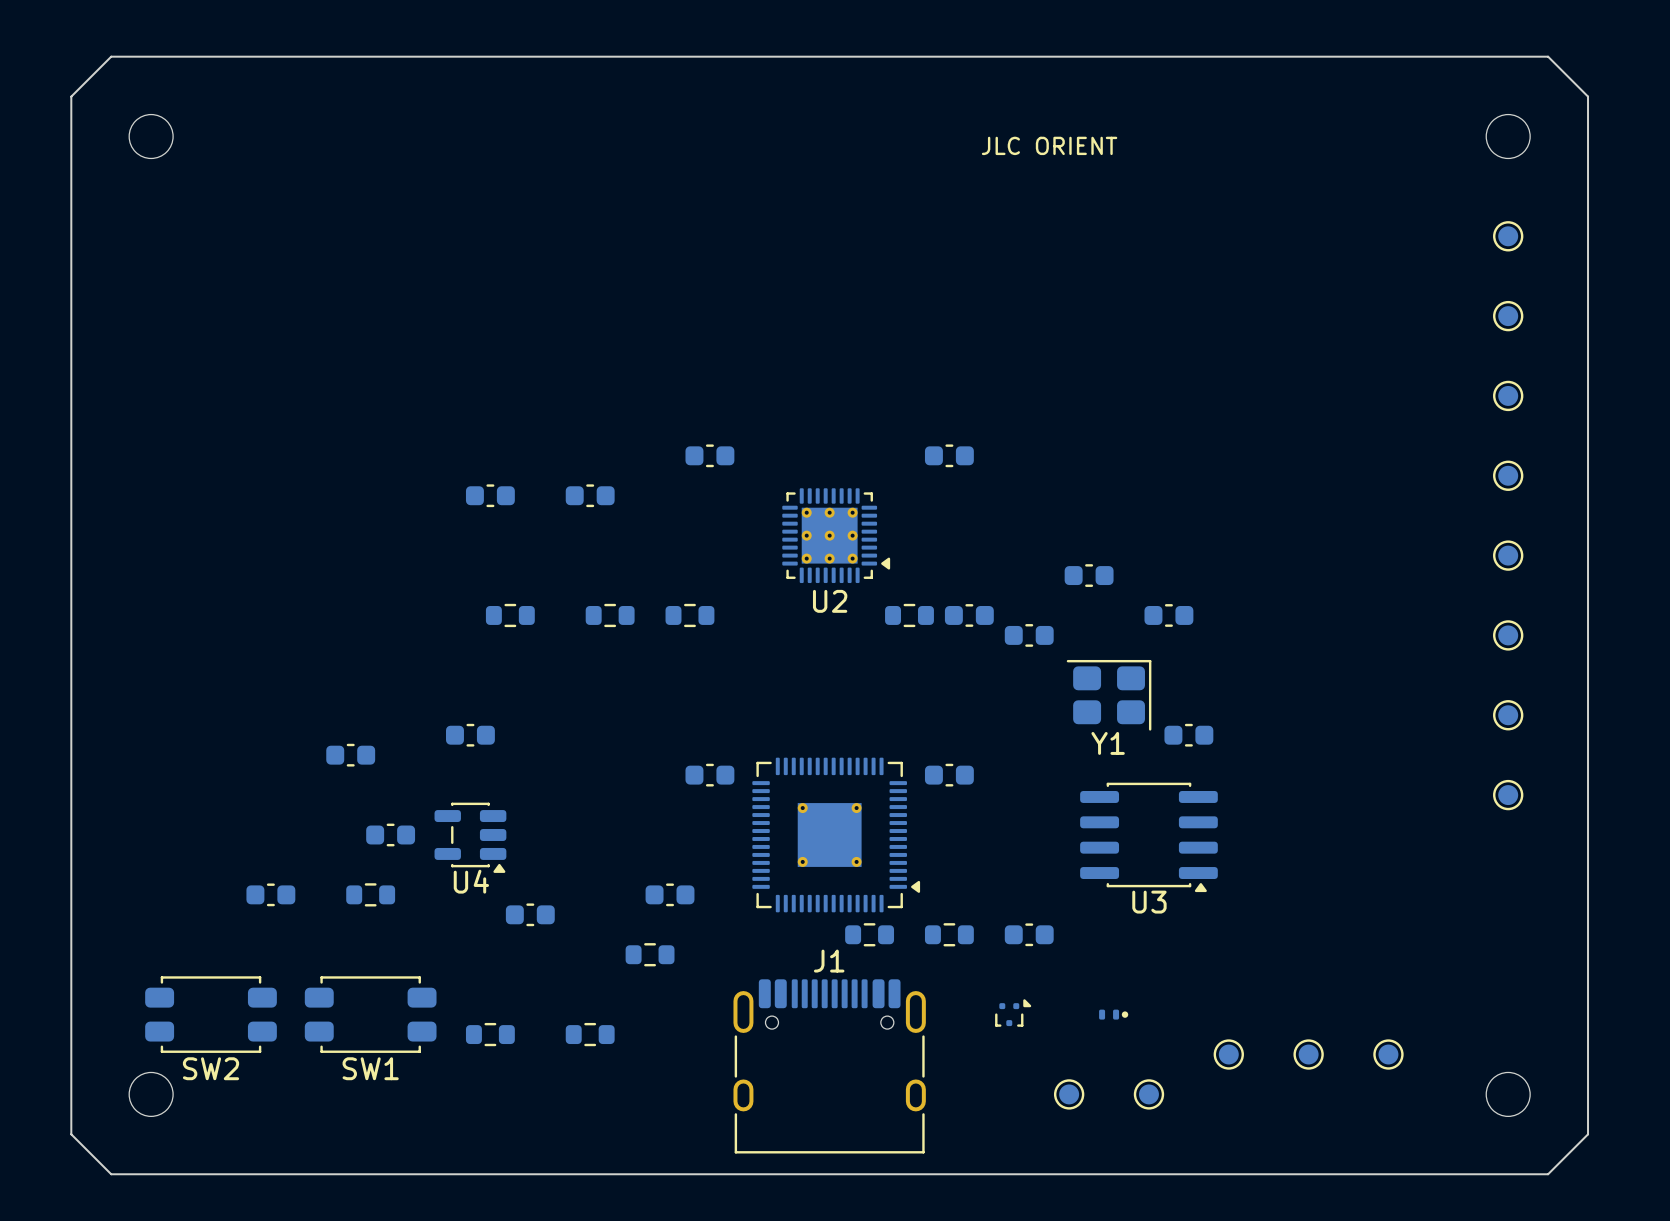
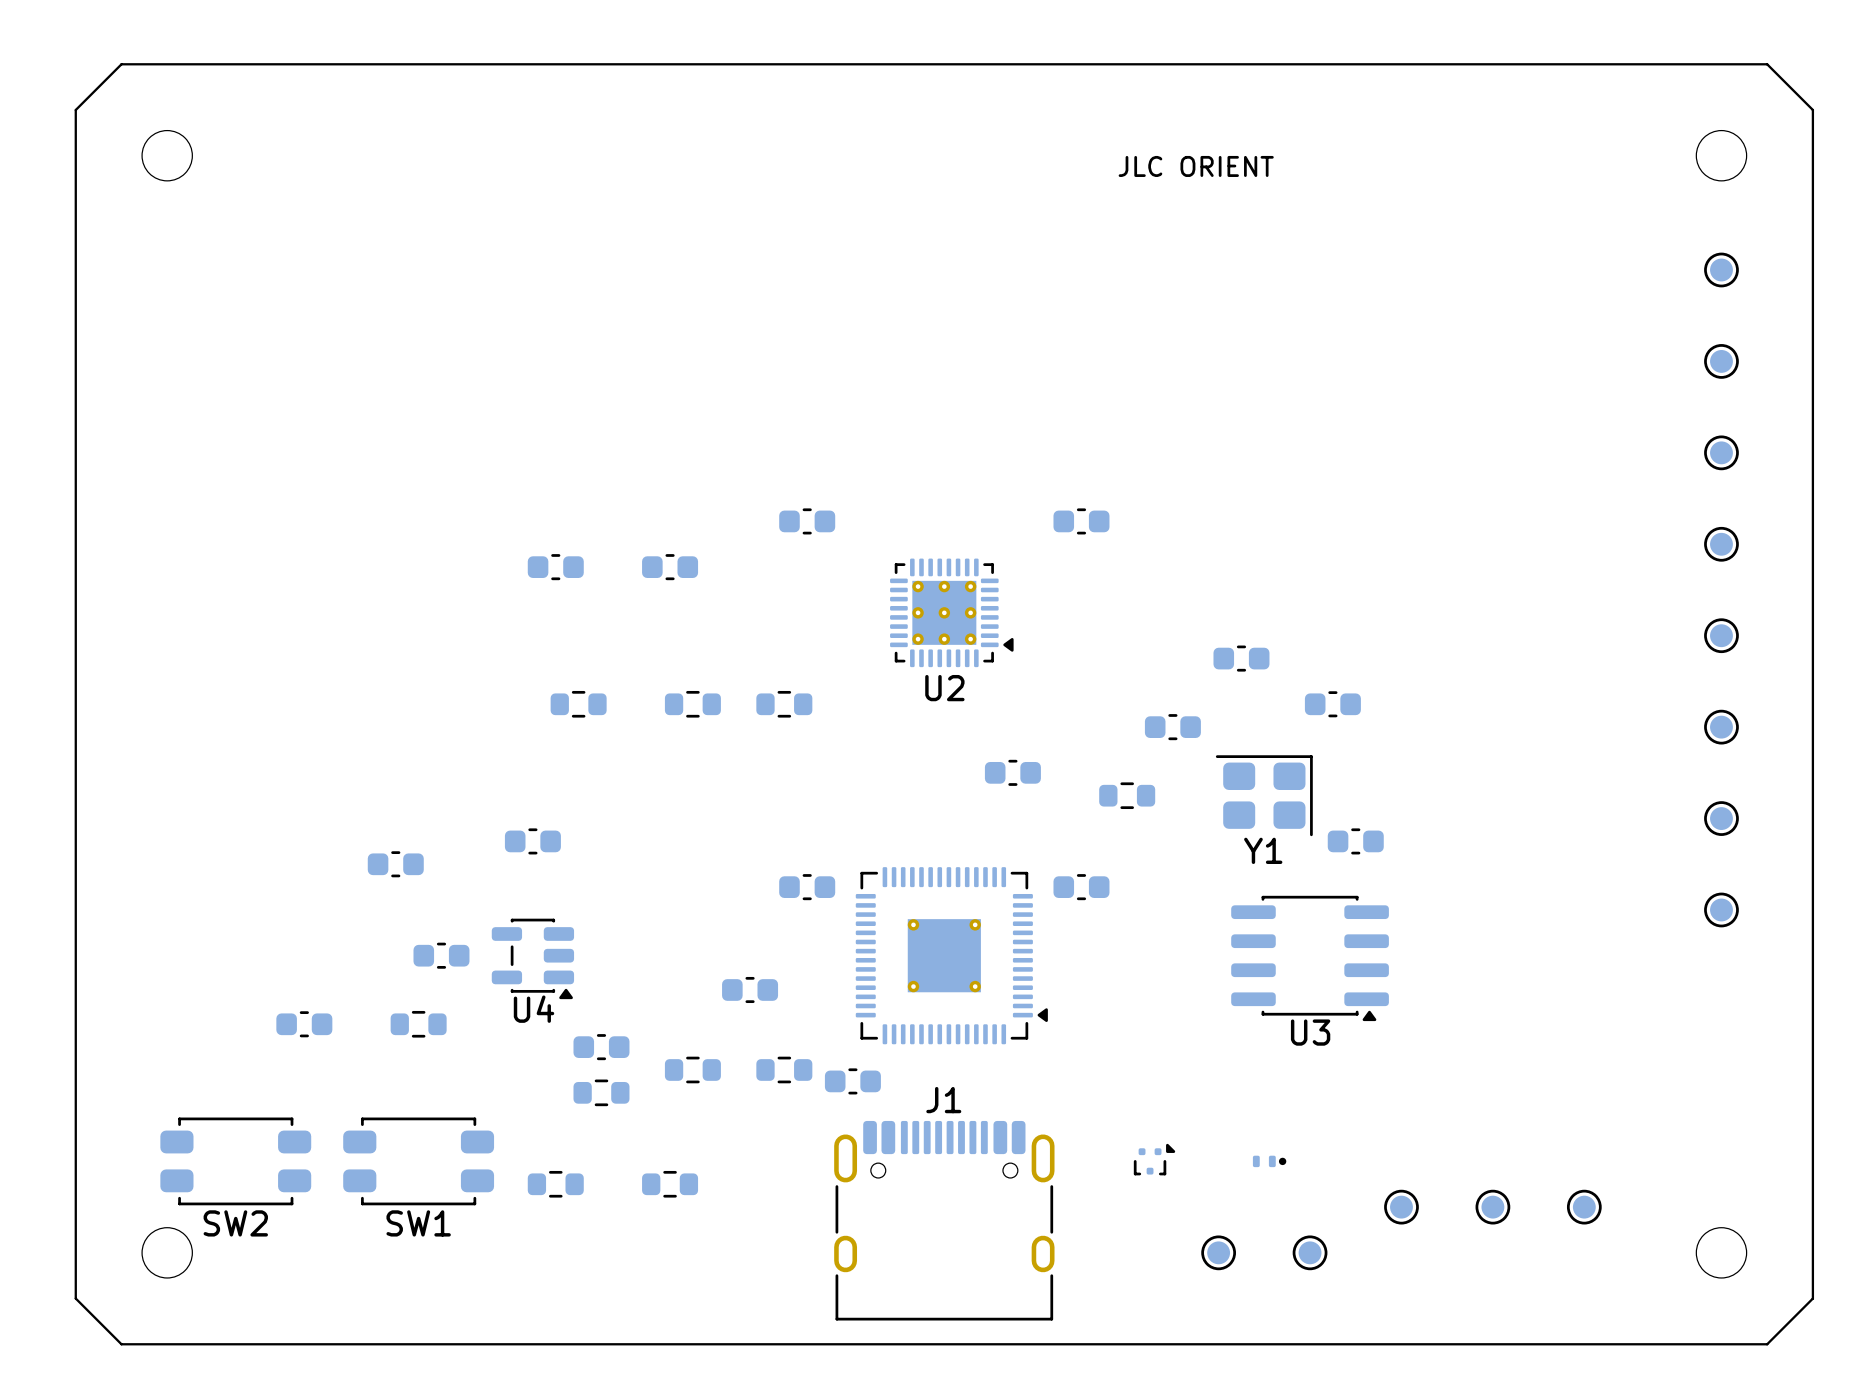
part position: (909, 615) -> (1127, 795)
part position: (969, 615) -> (1012, 772)
part position: (670, 894) -> (750, 989)
part: none -> (692, 1069)
part: none -> (784, 1069)
part: (869, 934) -> none
part: (949, 934) -> none
part: (1029, 934) -> none
part: none -> (852, 1081)
part: none -> (601, 1092)
part: (650, 954) -> none

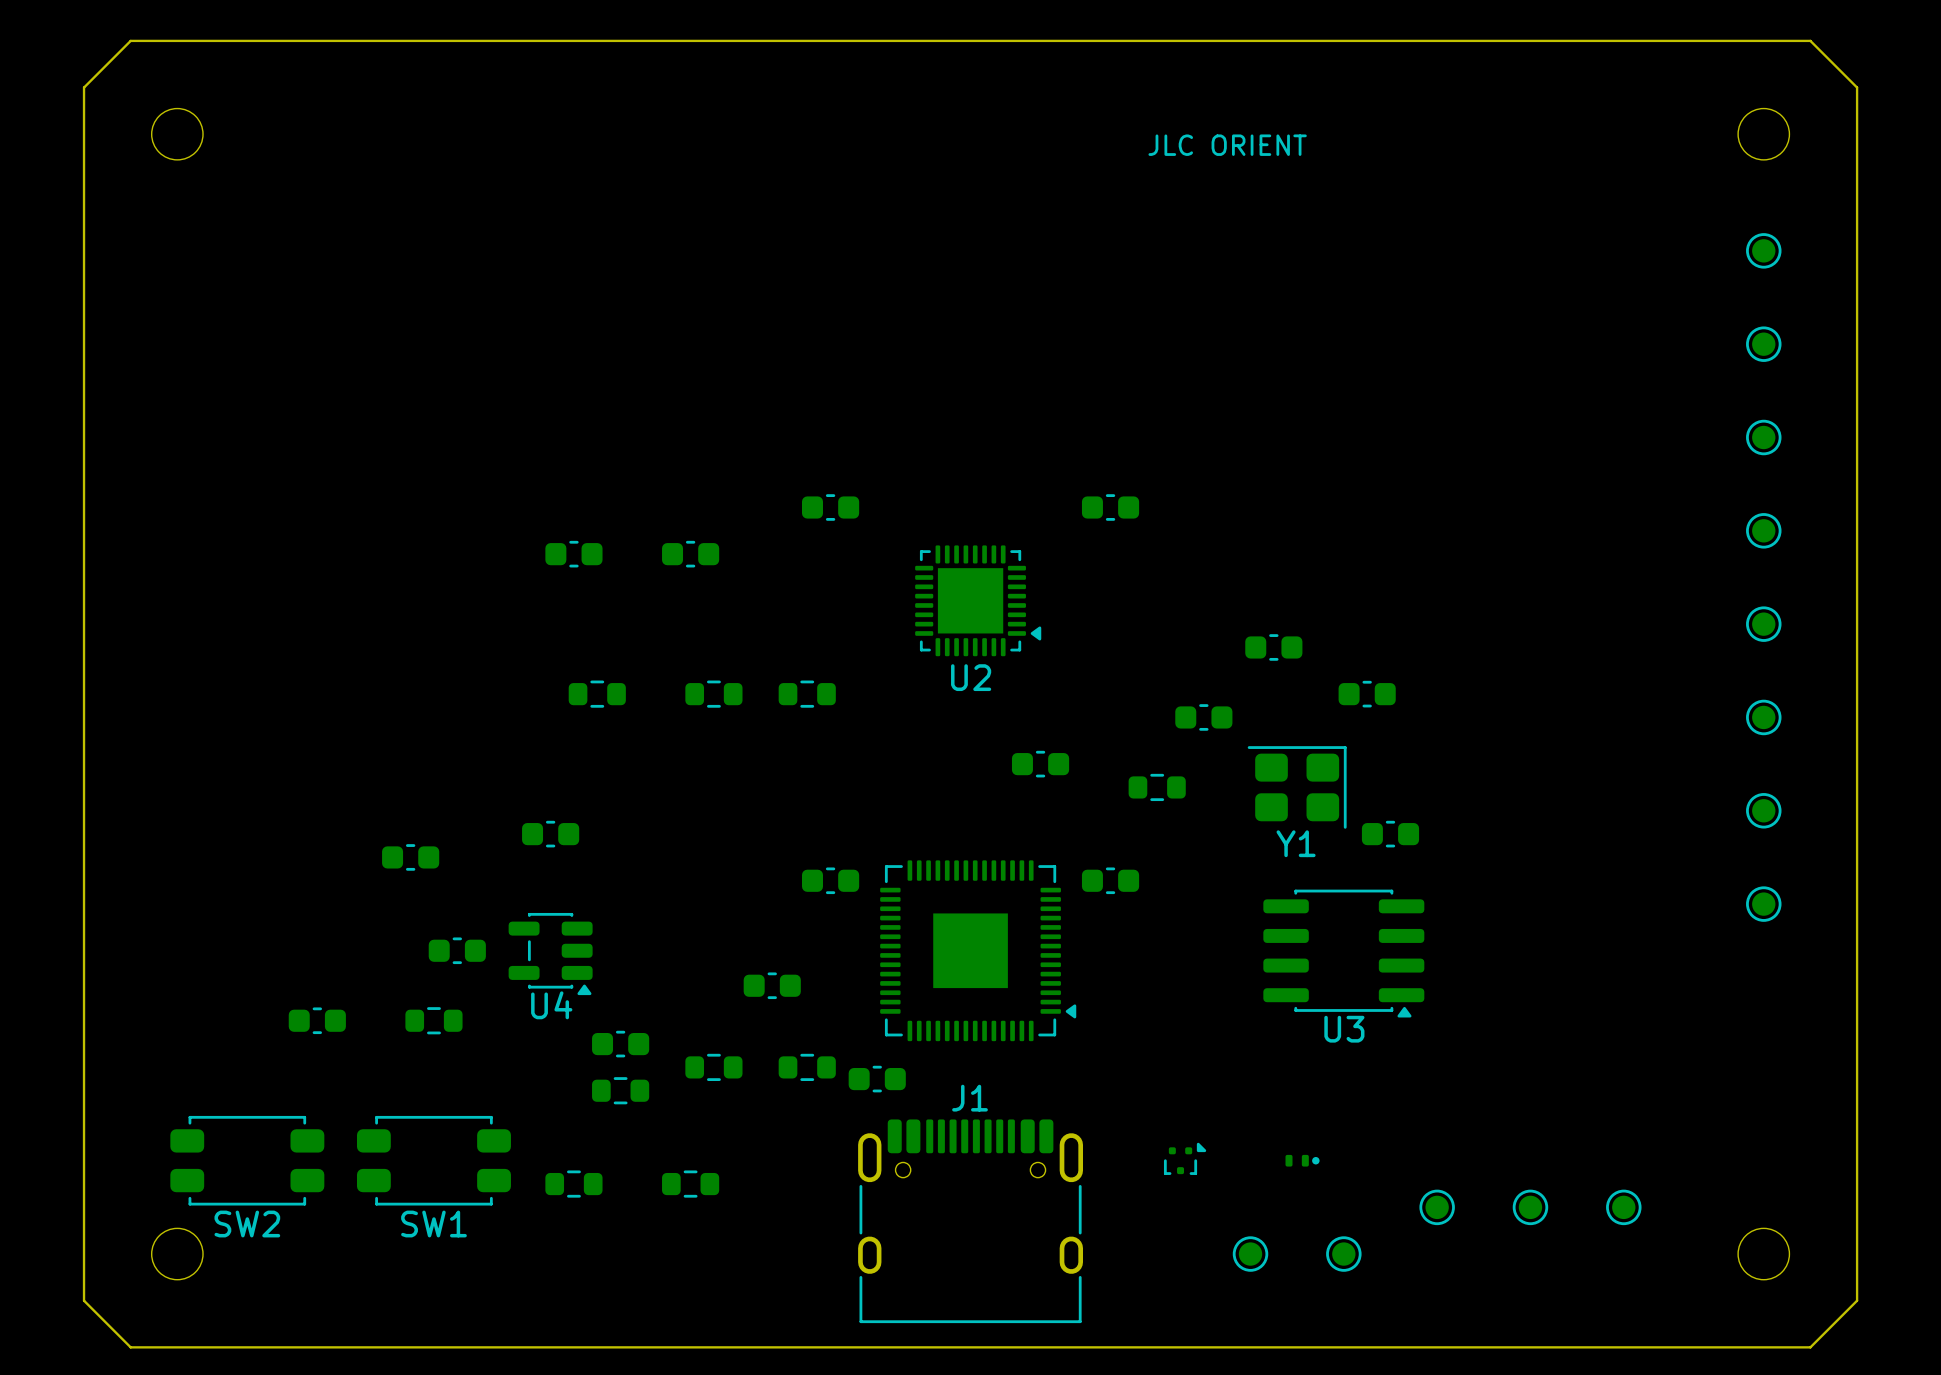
U2 footprint: [890, 558, 1014, 668] -> [915, 545, 1042, 657]
part footprint: [855, 867, 1048, 1045] -> [880, 860, 1077, 1042]

